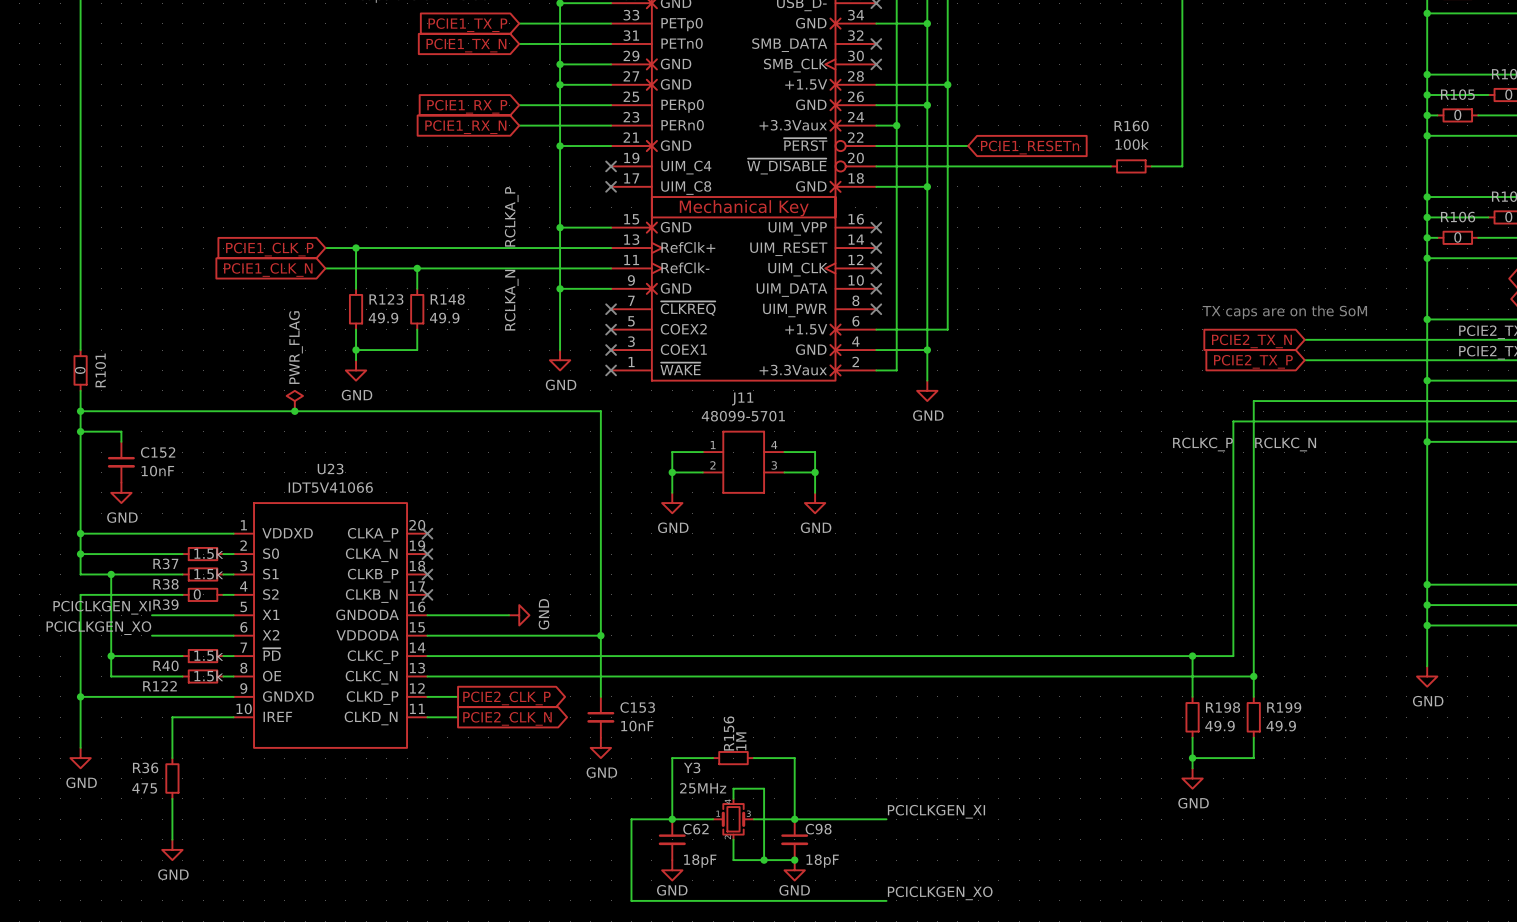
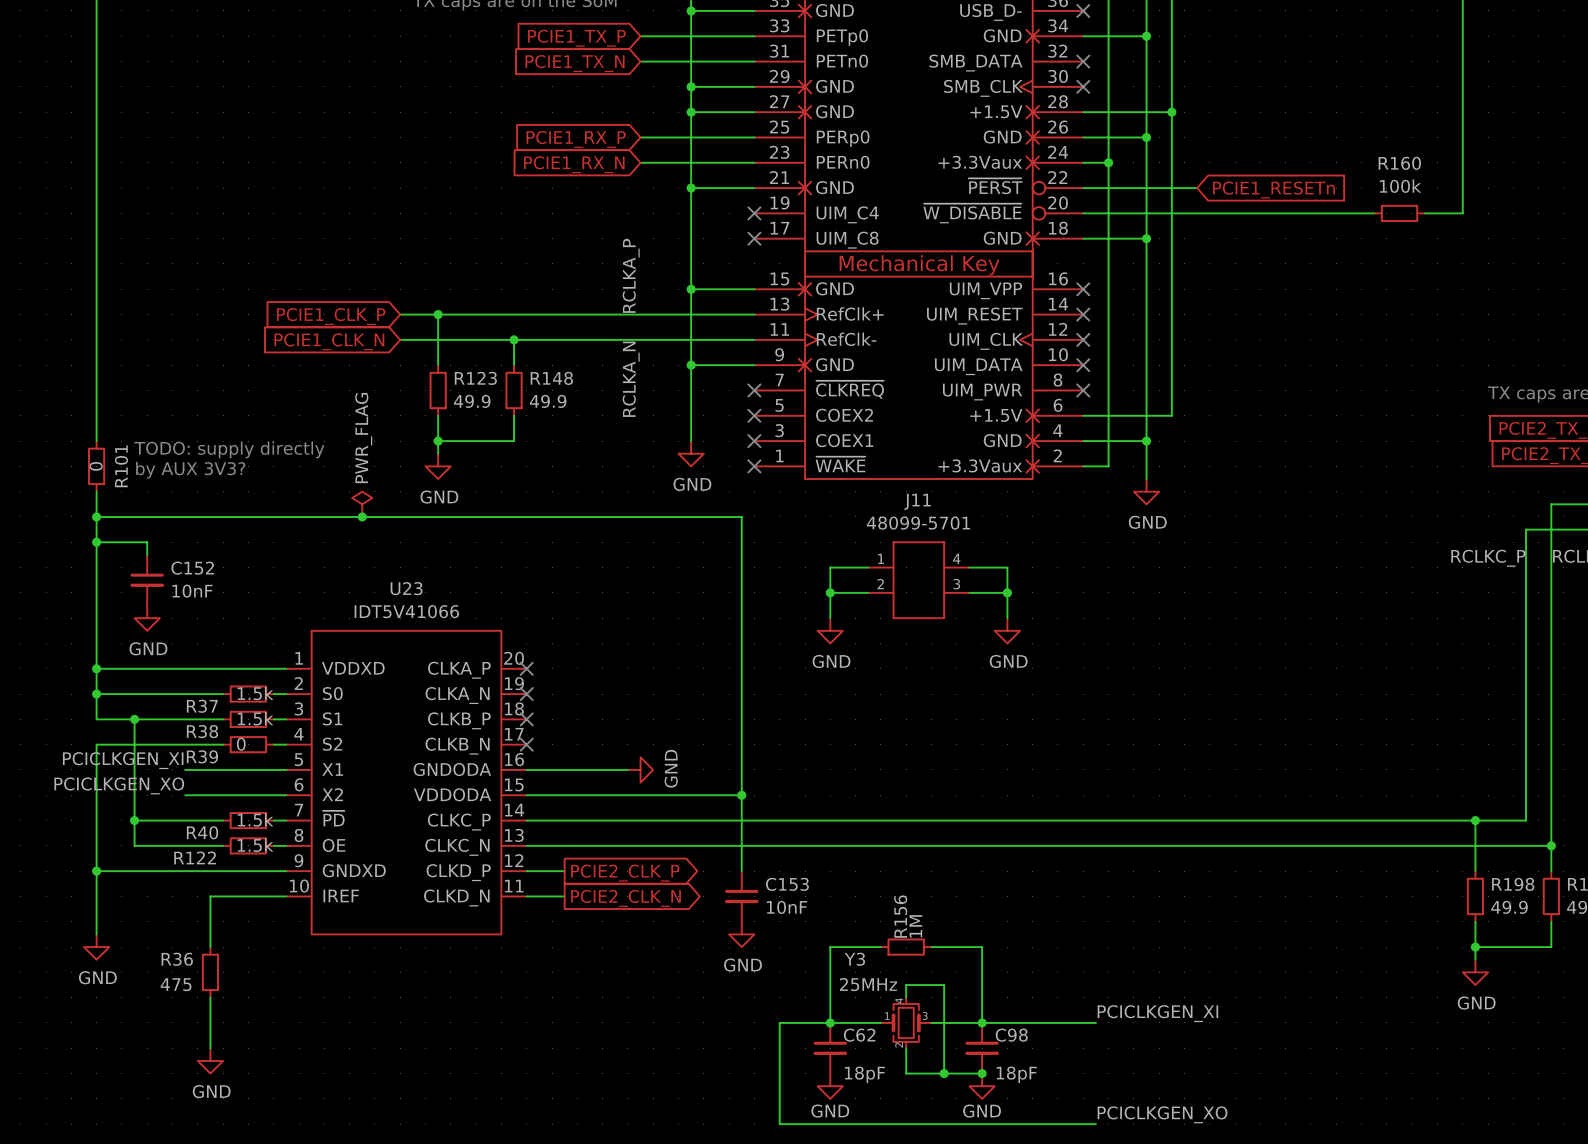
text: none -> TODO: supply directly (229, 449)
text: none -> by AUX 3V3? (190, 470)

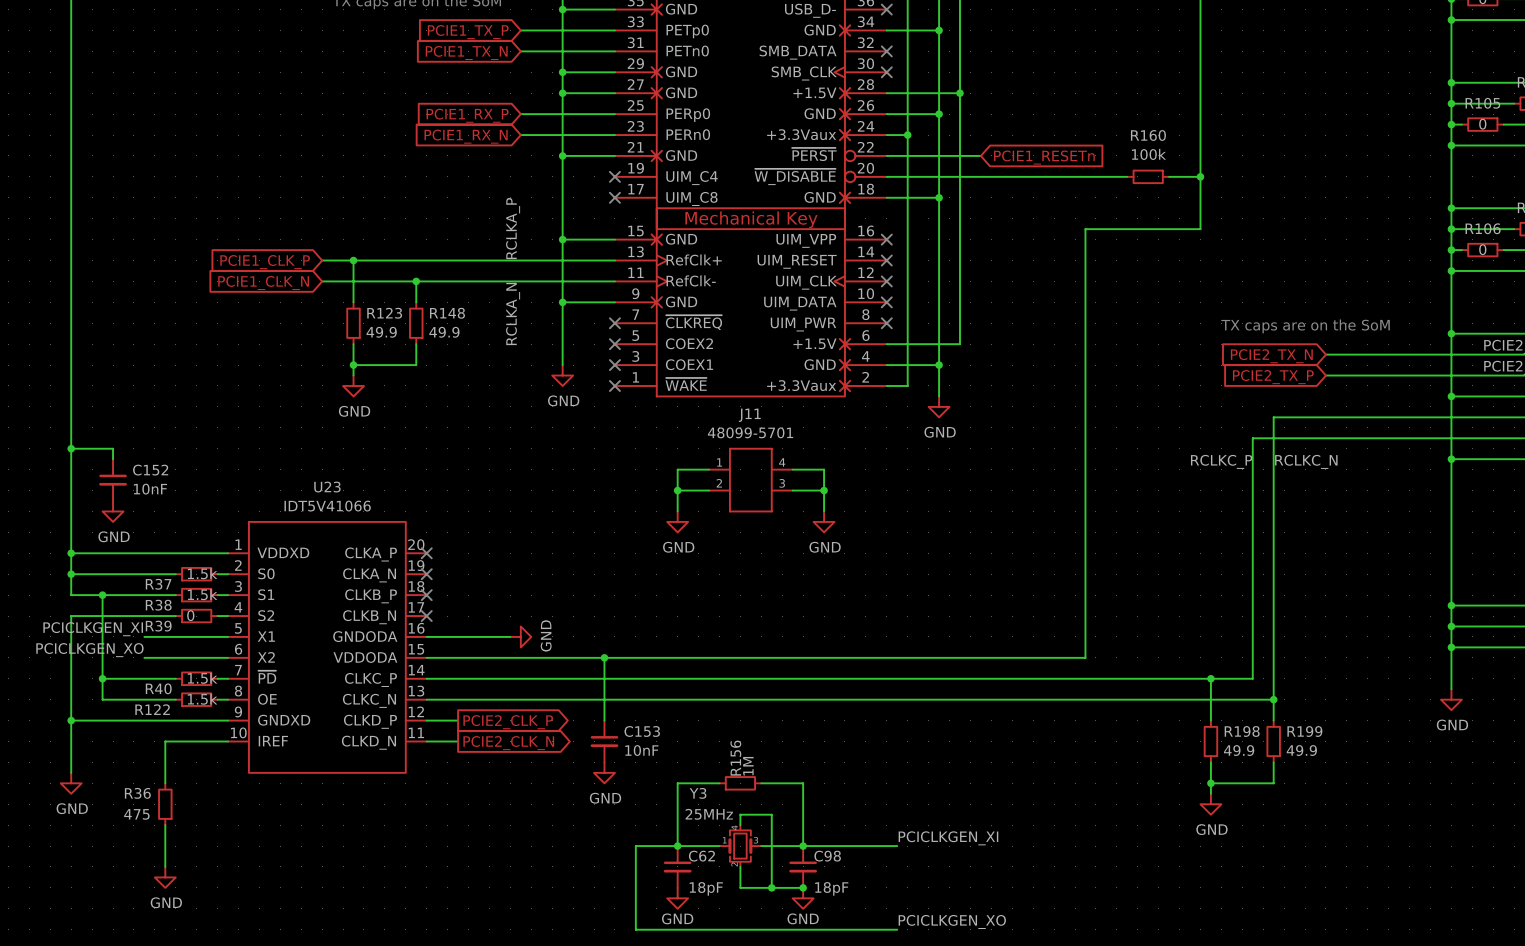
junction: none -> (1200, 176)
wire: none -> (71, 365) (71, 406)
text: TODO: supply directly (229, 449) -> none
R101: 0 (96, 466) -> none
text: by AUX 3V3? (190, 470) -> none
power symbol: PWR_FLAG (362, 504) -> none
wire: (96, 516) (741, 516) (741, 795) -> (1200, 176) (1200, 229) (1085, 229) (1085, 657) (604, 657)
junction: (96, 516) -> none
junction: (362, 516) -> none

